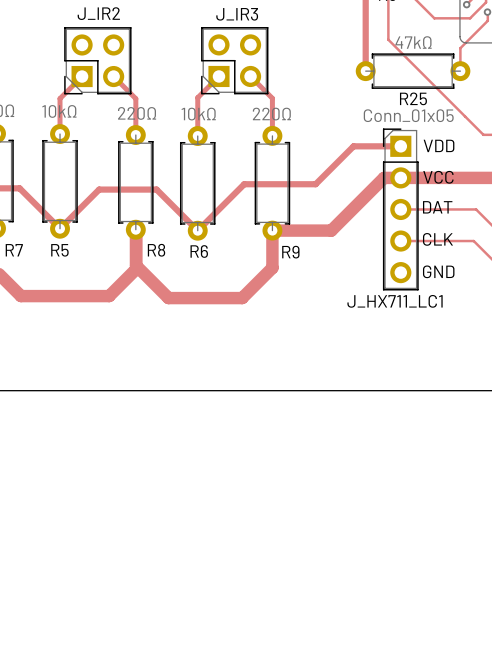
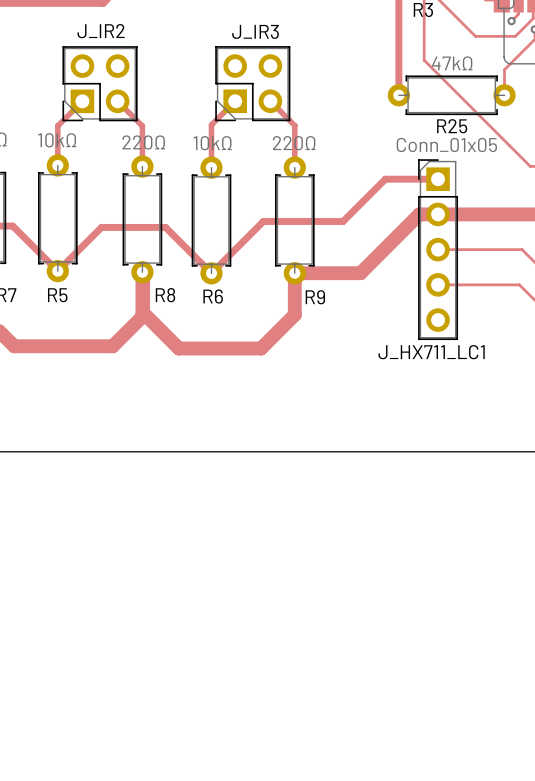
text: VDD (439, 145) -> none
text: VCC (438, 177) -> none
text: DAT (437, 207) -> none
text: CLK (437, 239) -> none
text: GND (438, 271) -> none

